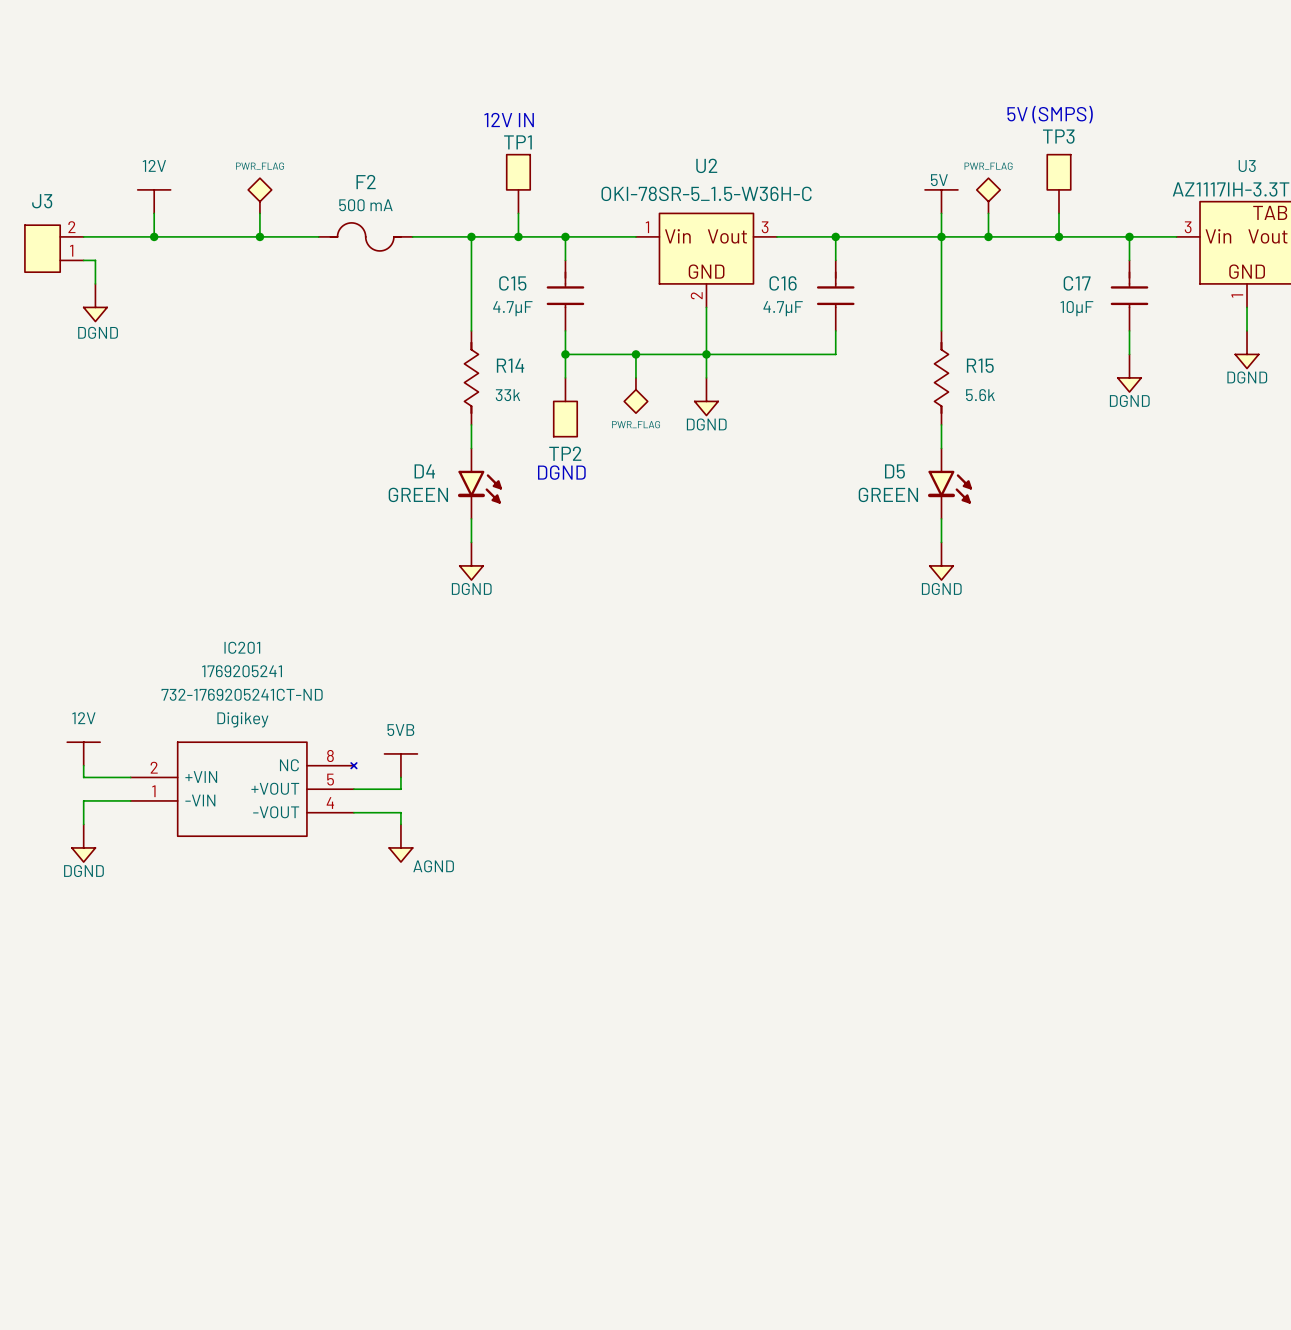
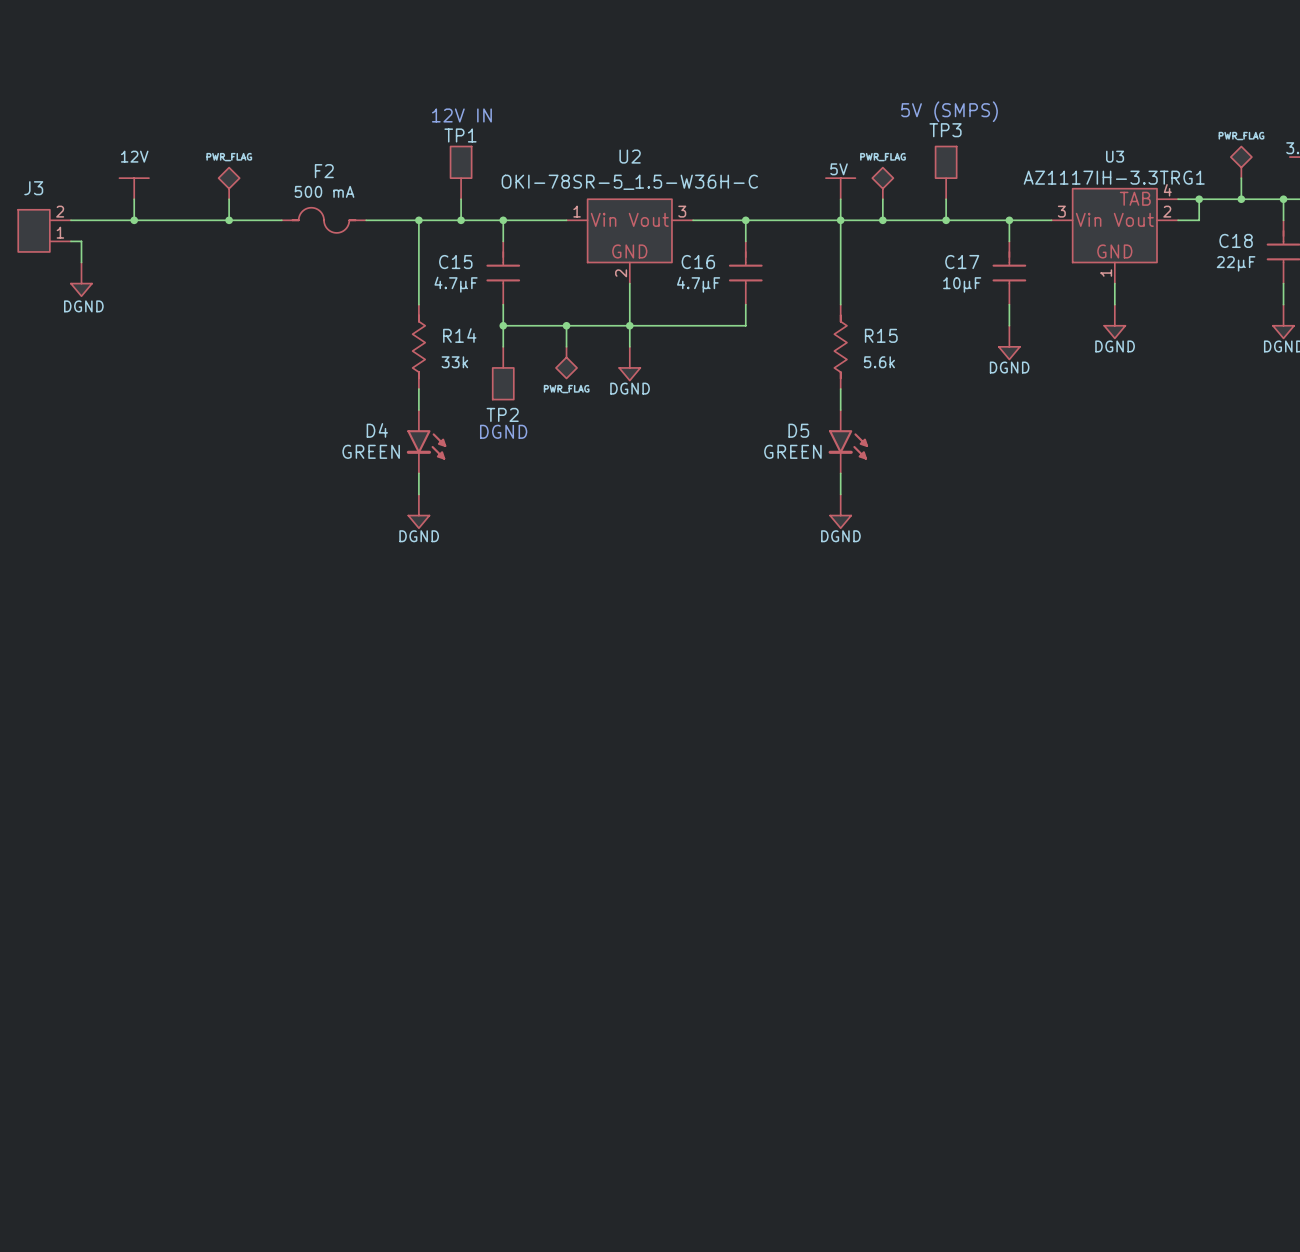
power symbol: 12V (83, 753) -> none
wire: (83, 765) (83, 777) (130, 777) -> none
power symbol: 5VB (400, 765) -> none
wire: (400, 777) (400, 789) (353, 789) -> none
IC201: 1769205241 (243, 789) -> none
wire: (130, 800) (83, 800) (83, 824) -> none
wire: (353, 812) (400, 812) (400, 824) -> none
power symbol: DGND (83, 843) -> none
power symbol: AGND (400, 843) -> none

